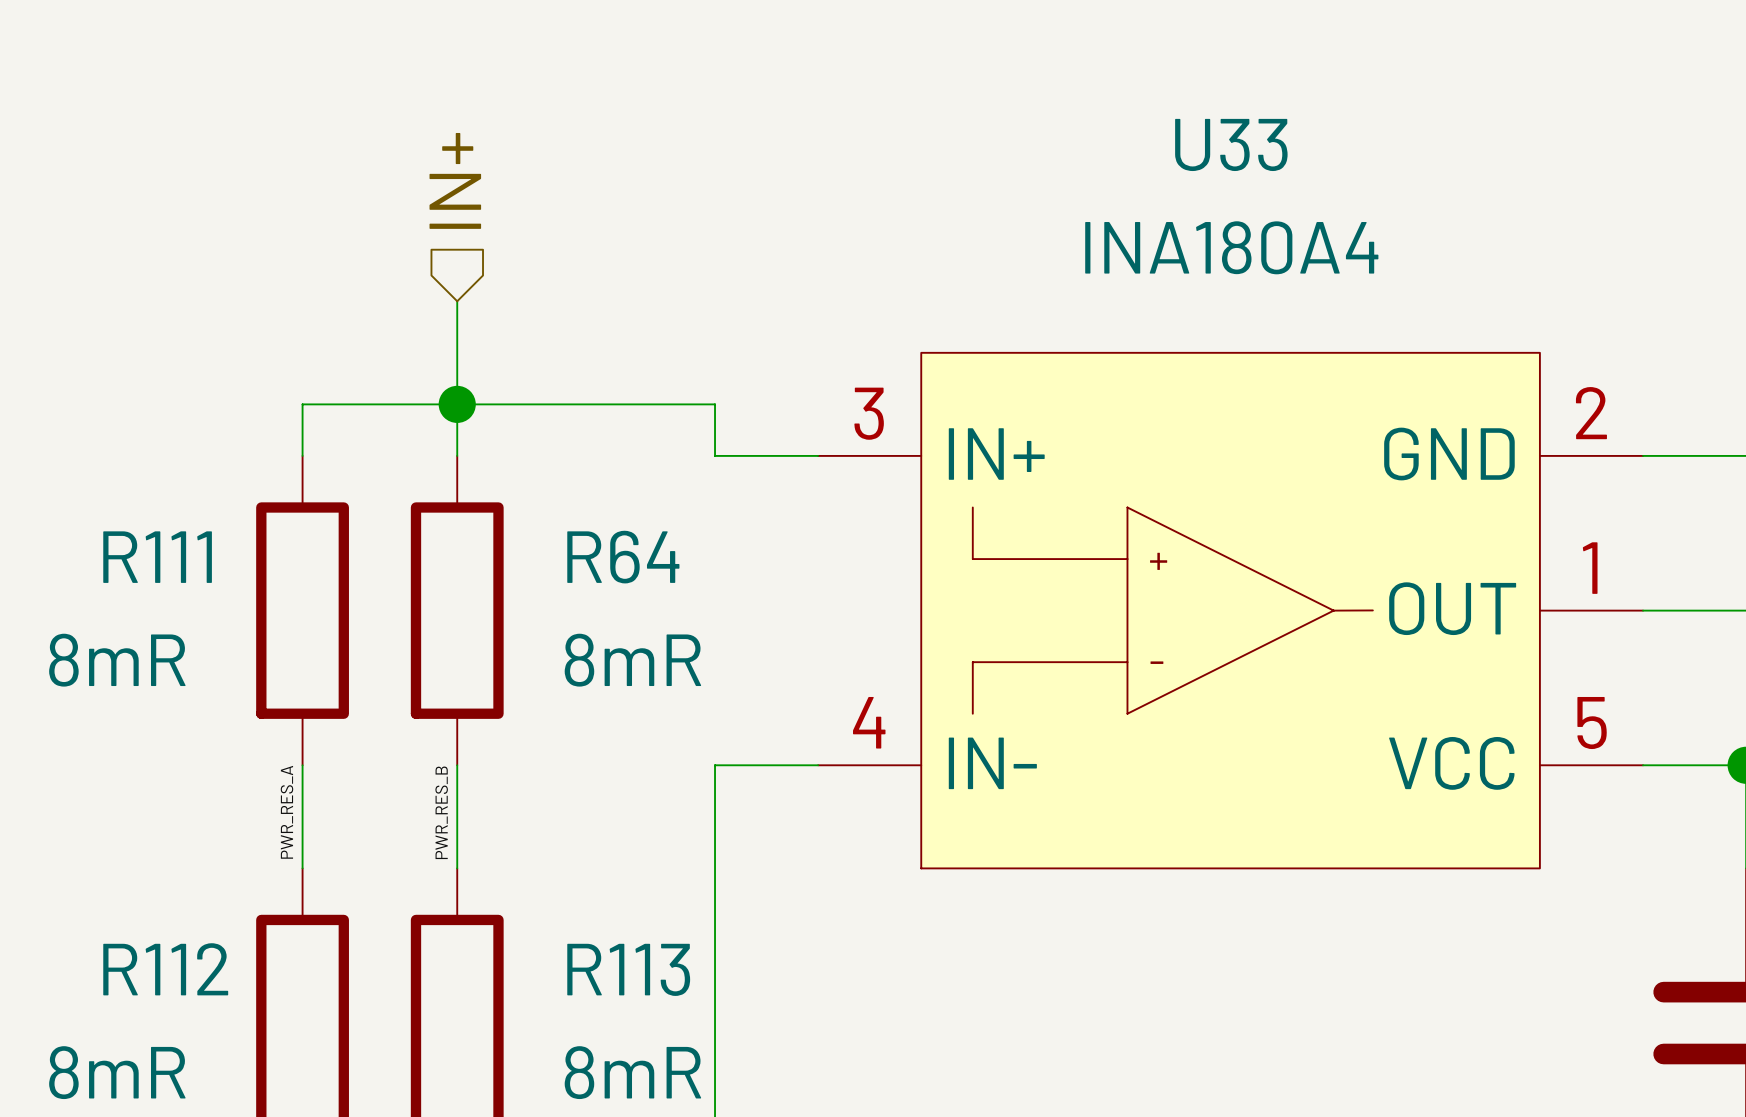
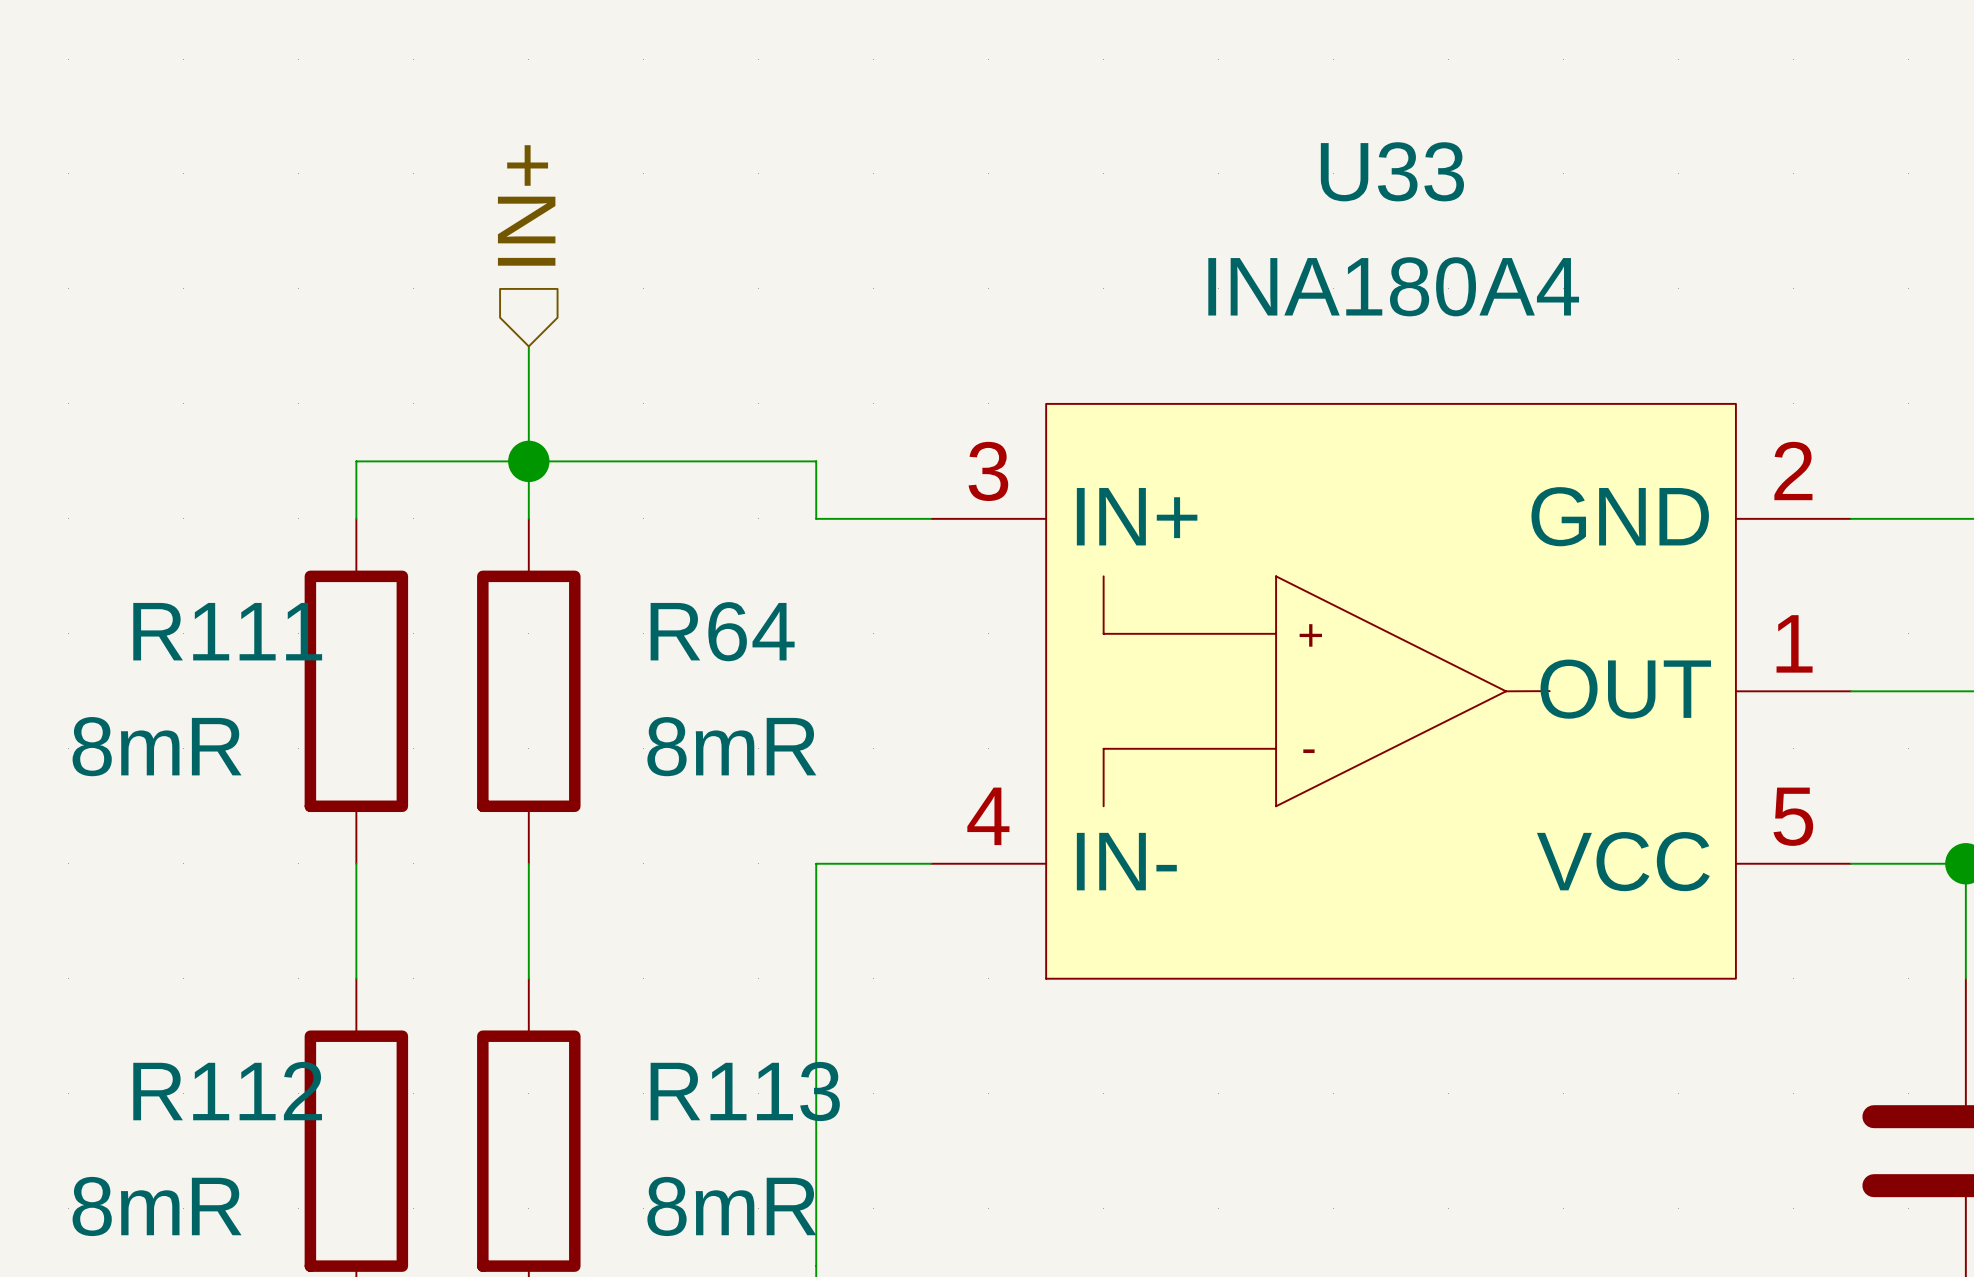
label: PWR_RES_A (286, 812) -> none
label: PWR_RES_B (441, 812) -> none

